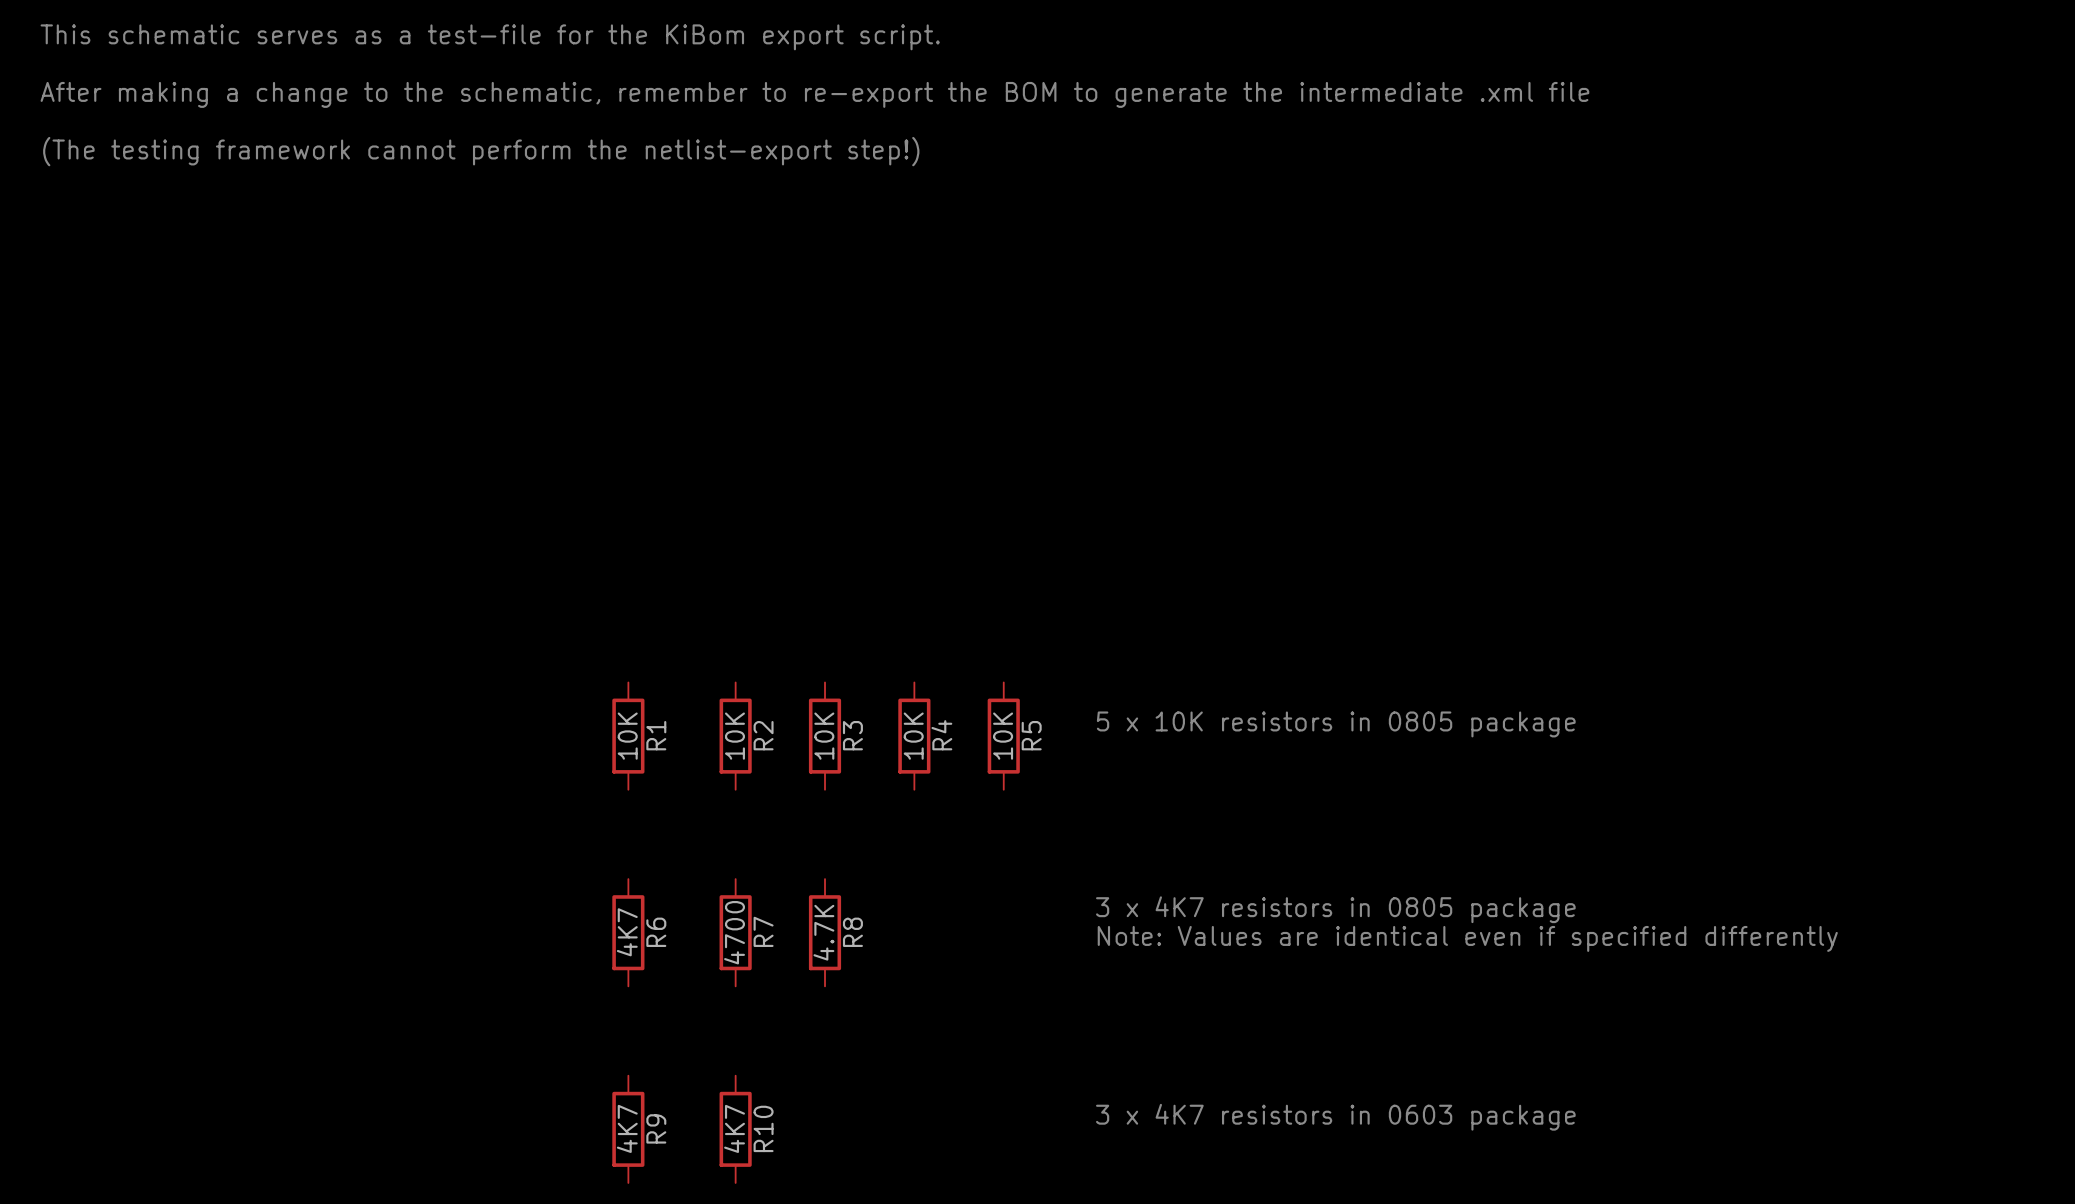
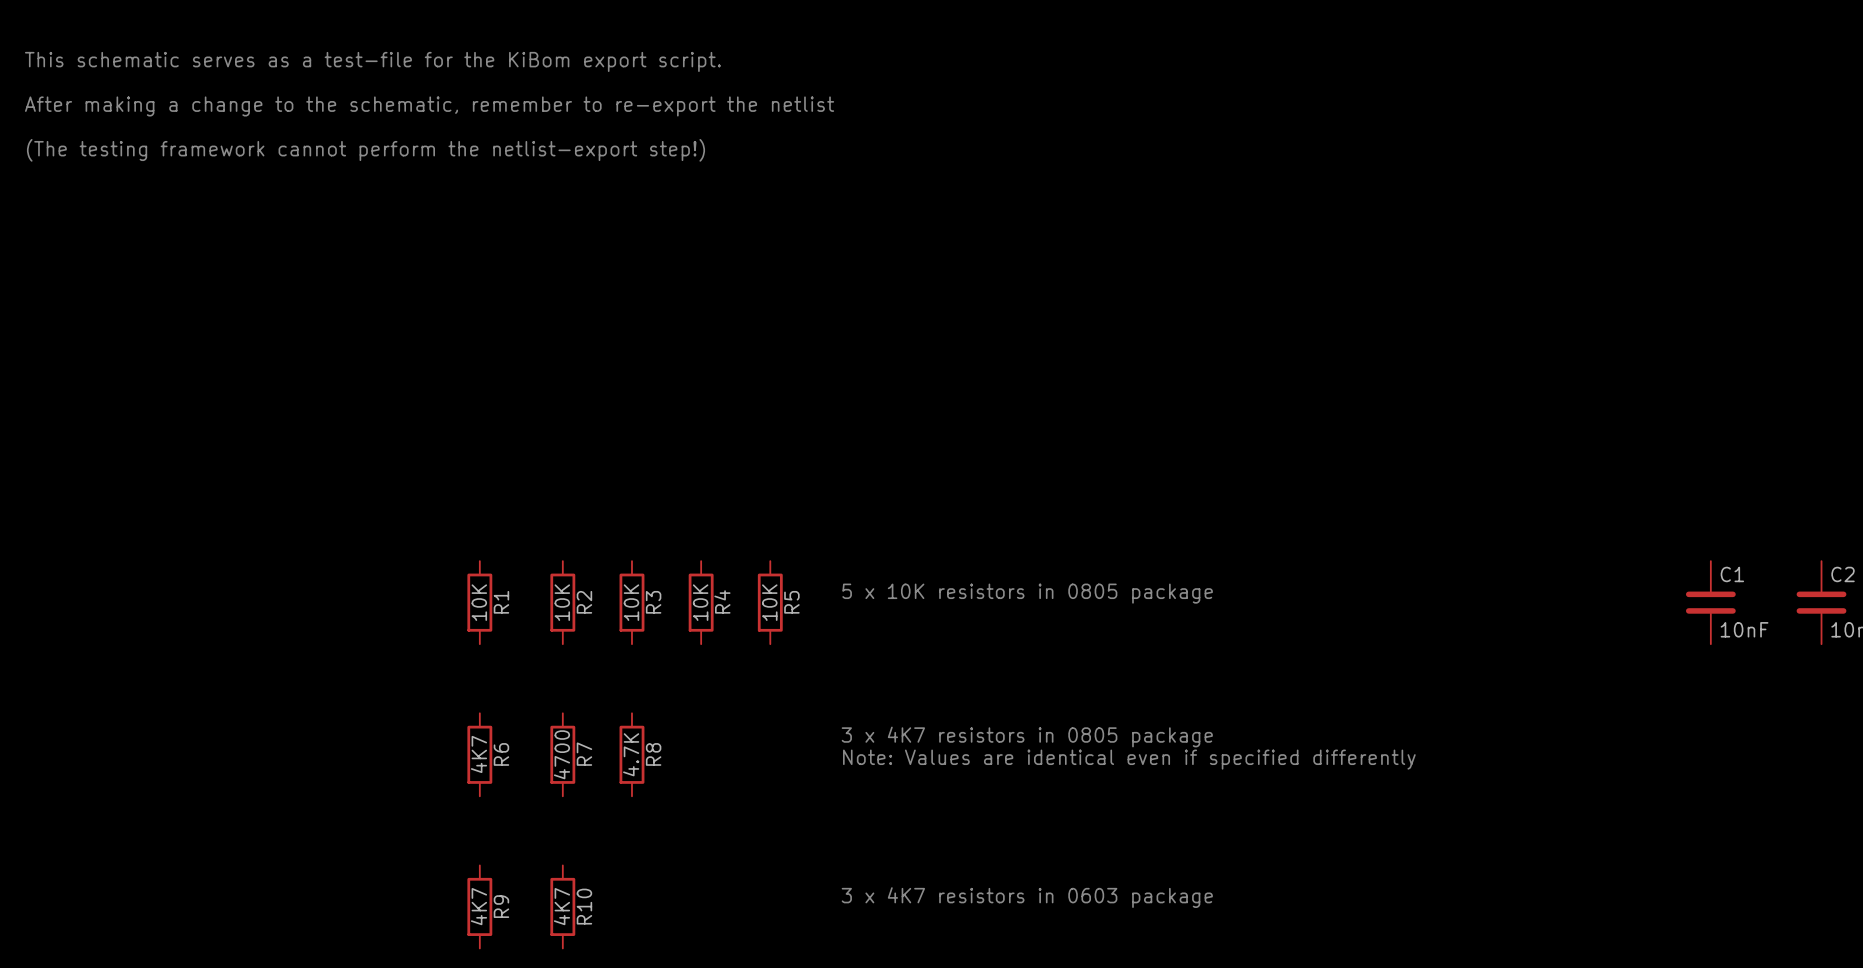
text: After making a change to the schematic, remember to re-export the BOM to generate the intermediate .xml file (814, 94) -> After making a change to the schematic, remember to re-export the netlist (429, 106)

